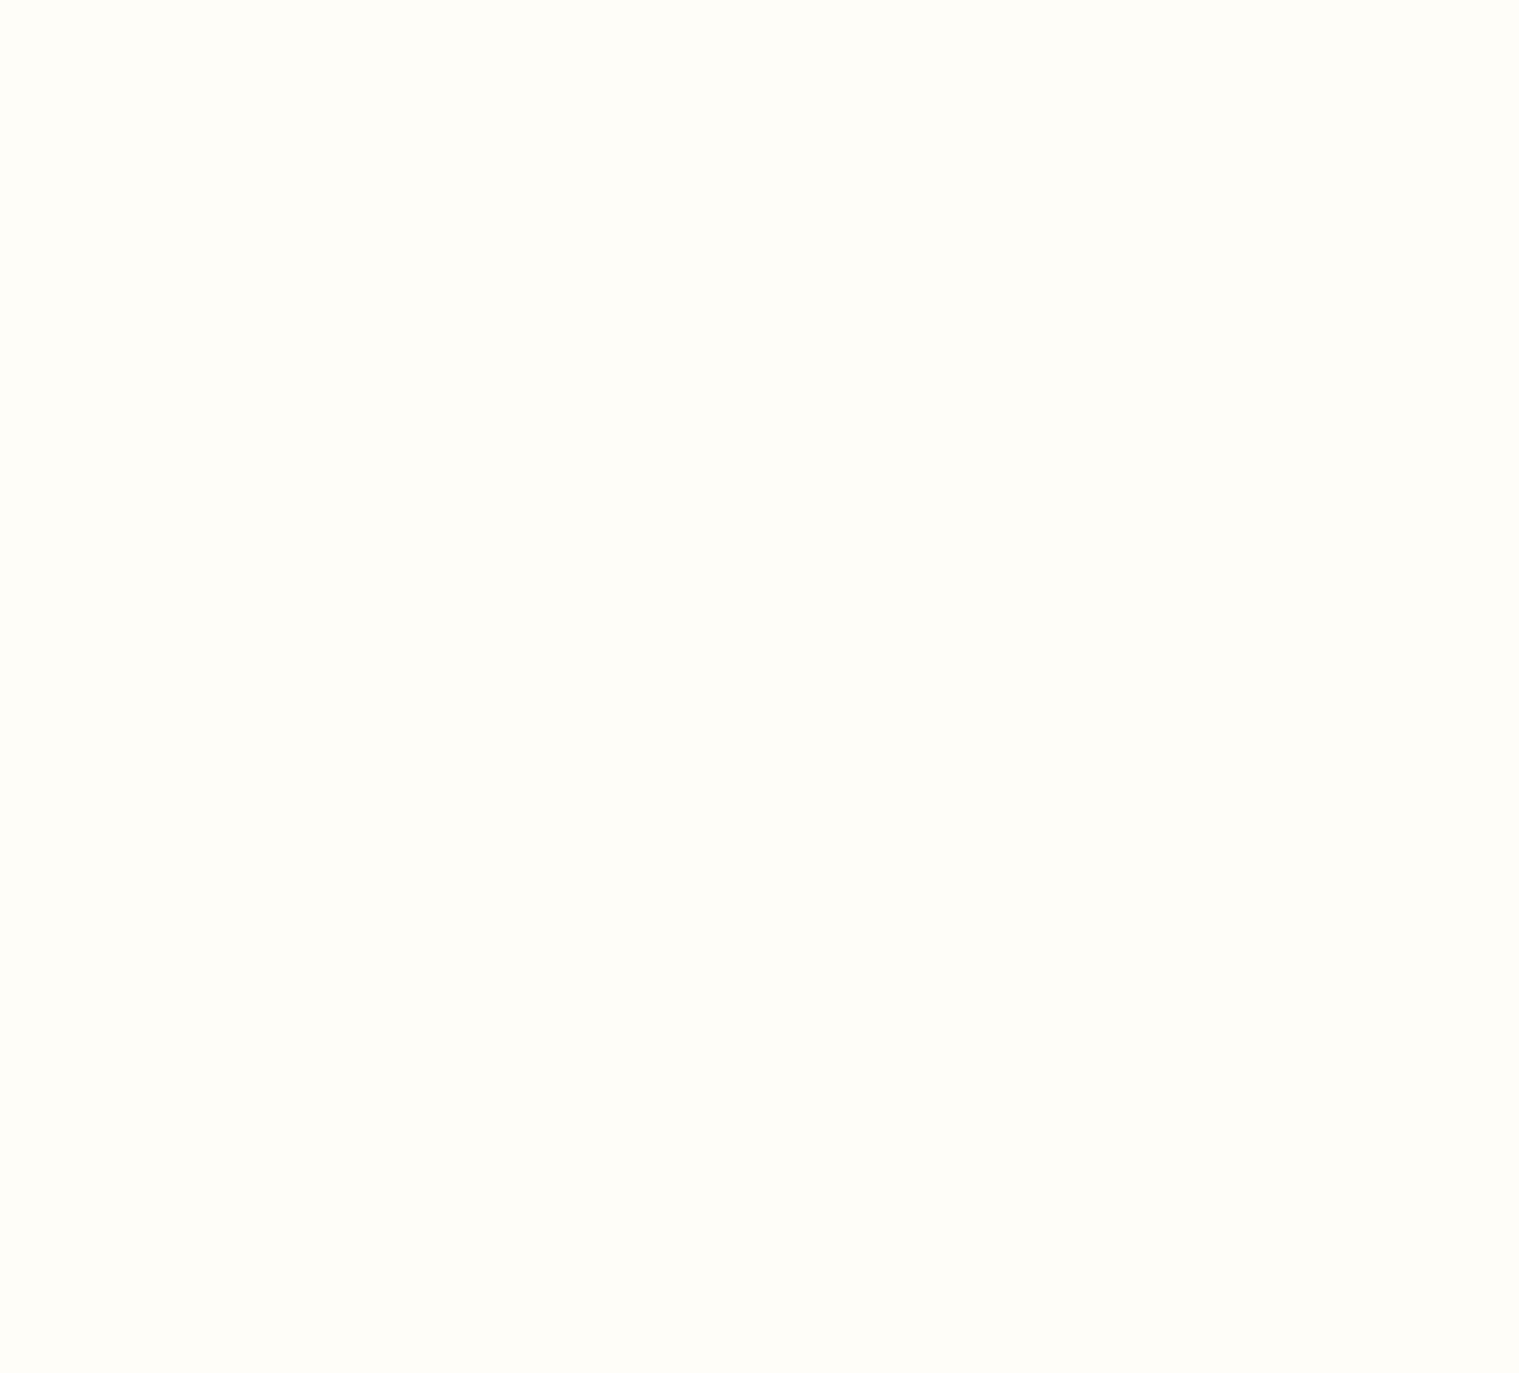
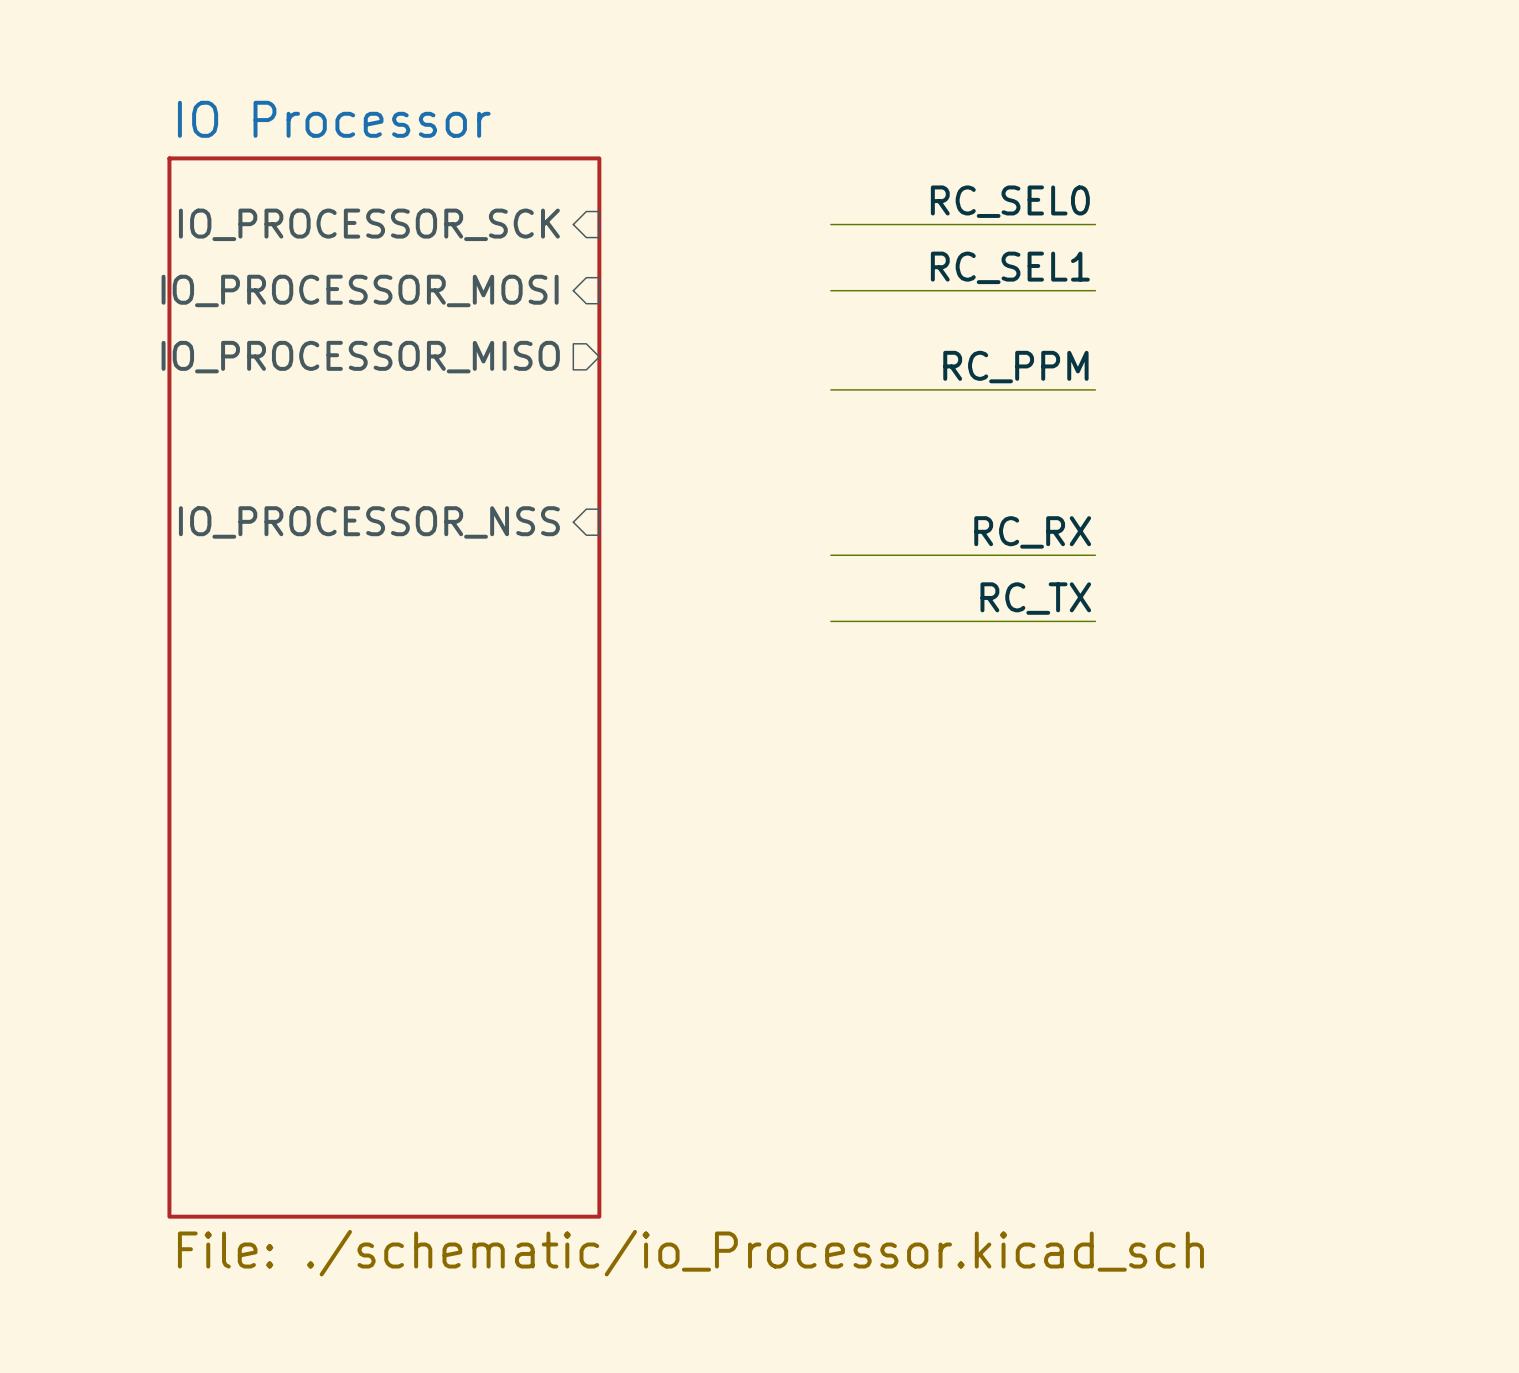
label: none -> RC_SEL0 (1010, 201)
wire: none -> (830, 224) (1095, 224)
sheet pin: none -> IO_PROCESSOR_SCK (369, 224)
label: none -> RC_SEL1 (1010, 267)
wire: none -> (830, 290) (1095, 290)
sheet pin: none -> IO_PROCESSOR_MOSI (360, 290)
sheet pin: none -> IO_PROCESSOR_MISO (360, 357)
label: none -> RC_PPM (1015, 367)
wire: none -> (830, 389) (1095, 389)
sheet pin: none -> IO_PROCESSOR_NSS (369, 522)
label: none -> RC_RX (1032, 532)
wire: none -> (830, 555) (1095, 555)
label: none -> RC_TX (1035, 598)
wire: none -> (830, 621) (1095, 621)
sheet IO Processor: none -> File: ./schematic/io_Processor.kicad_sch (384, 687)

